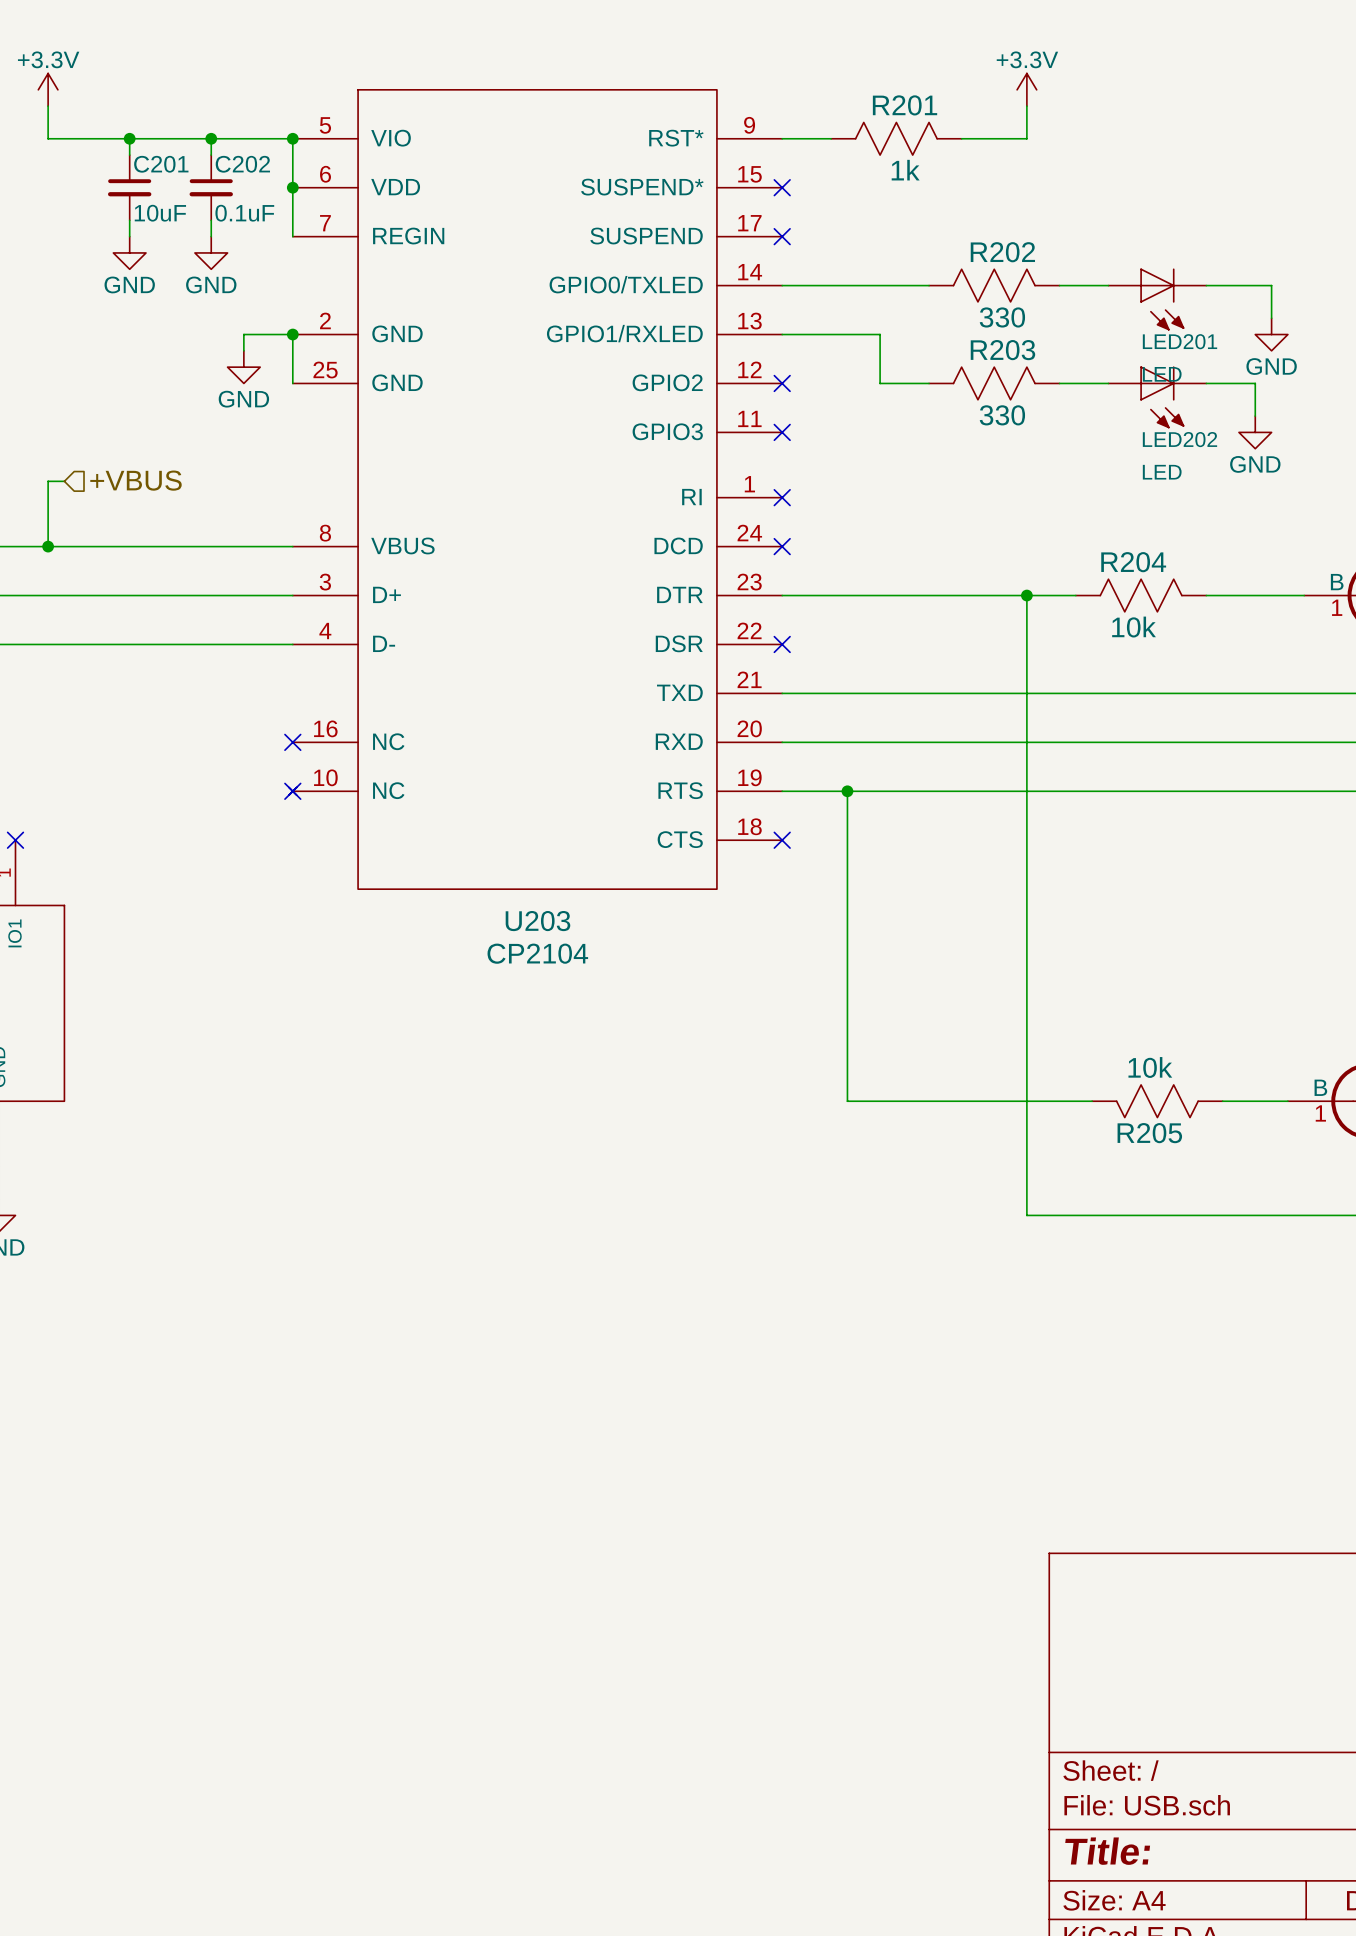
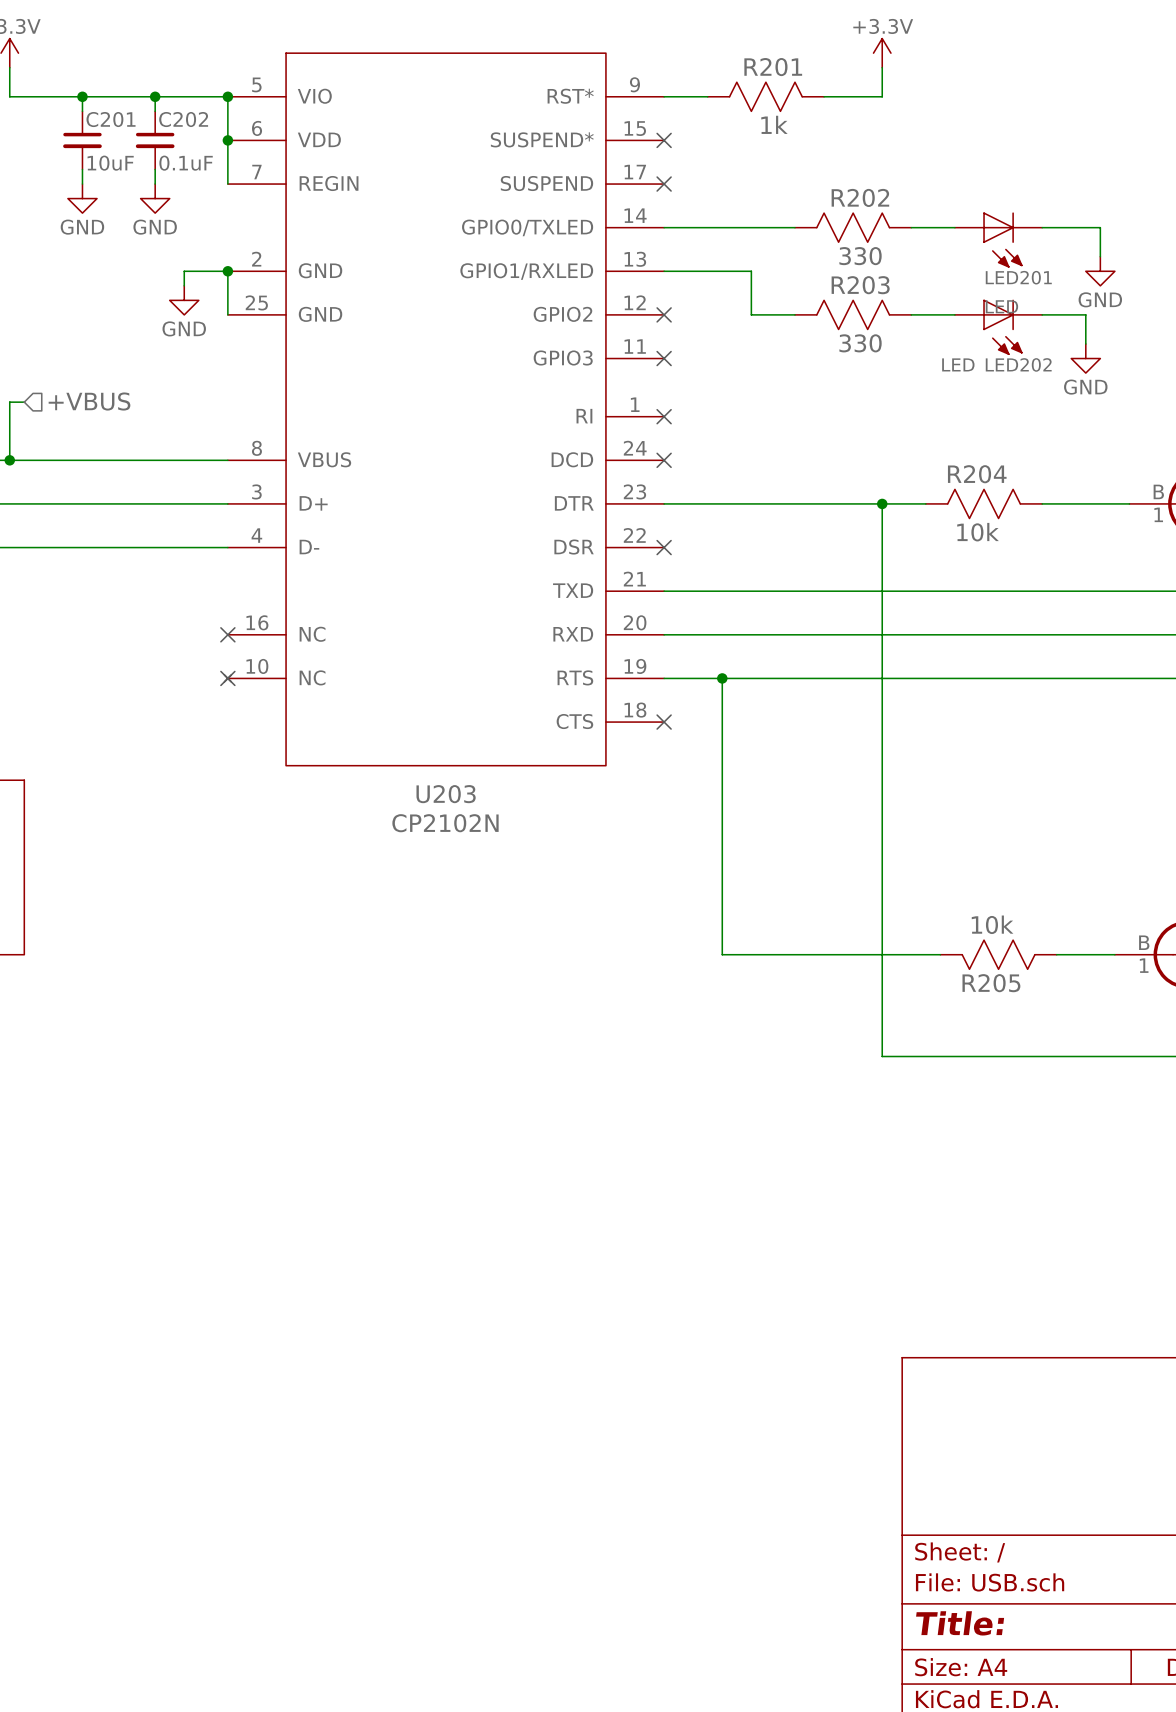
LED202 value position: LED (1162, 472) -> LED (958, 364)
U203 value: CP2104 (537, 953) -> CP2102N (445, 823)

